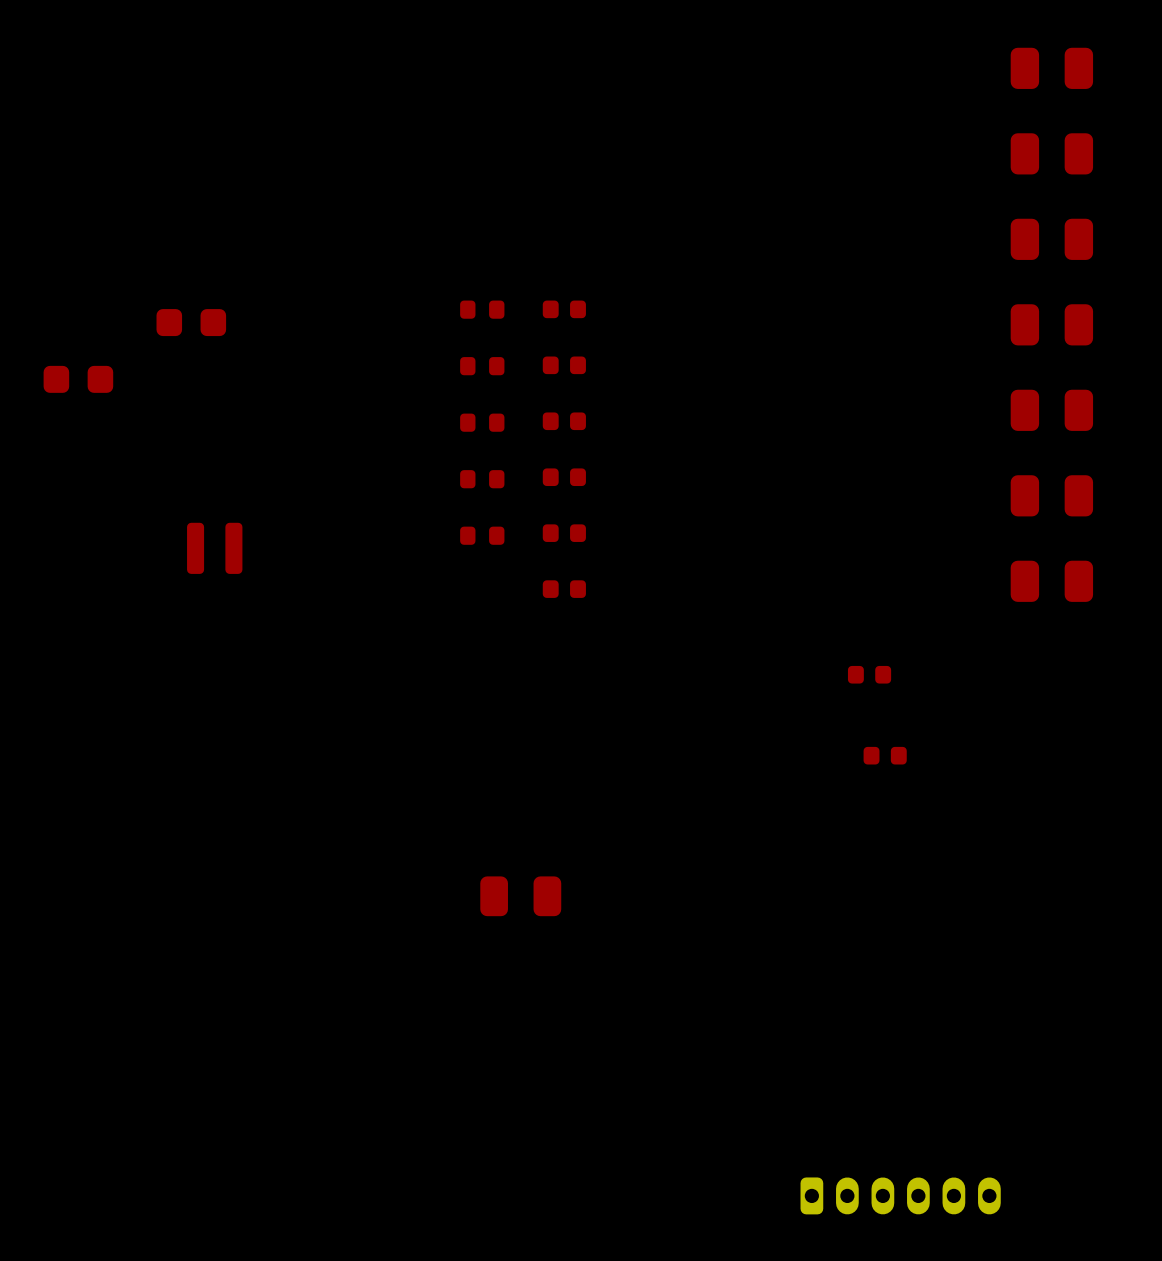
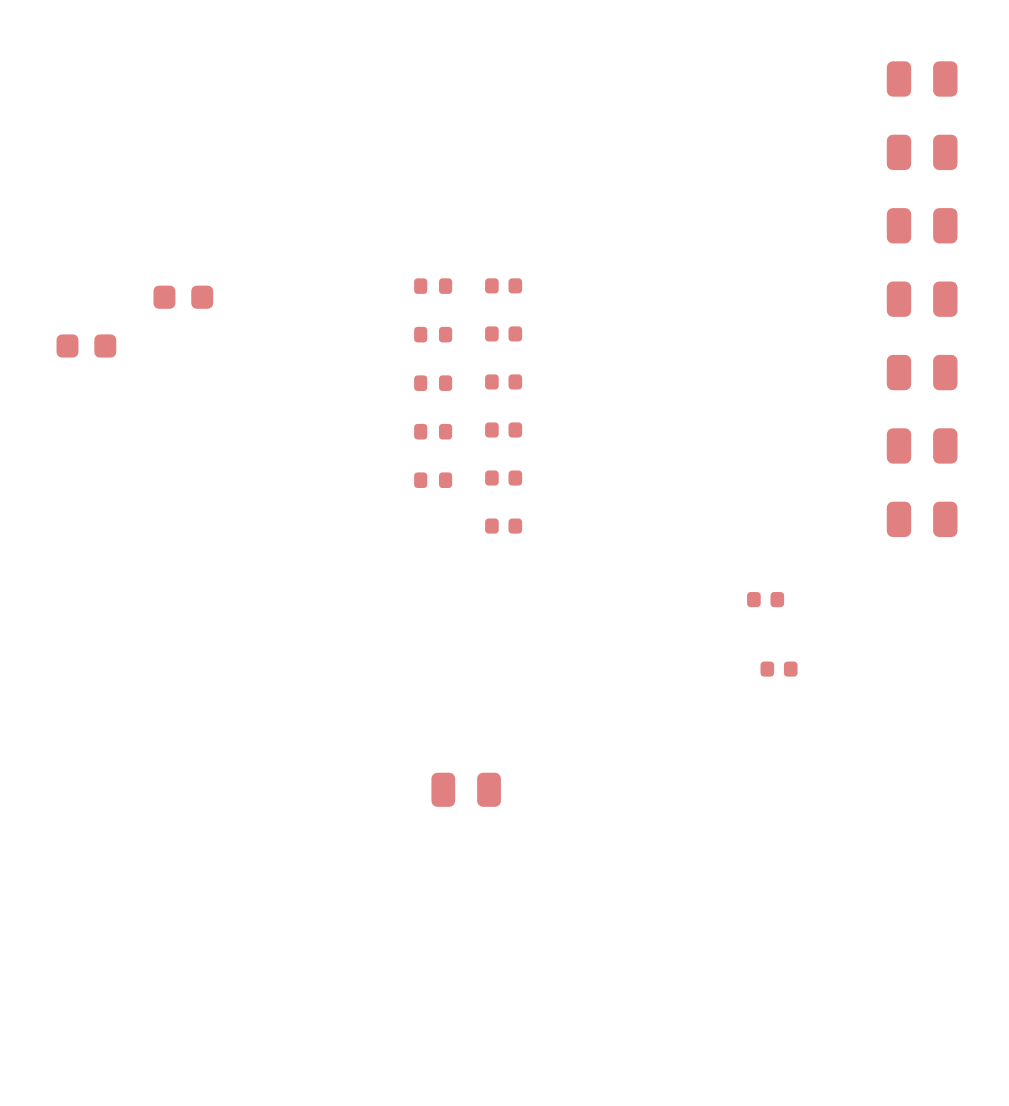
part: (214, 548) -> none
part: (900, 1195) -> none

